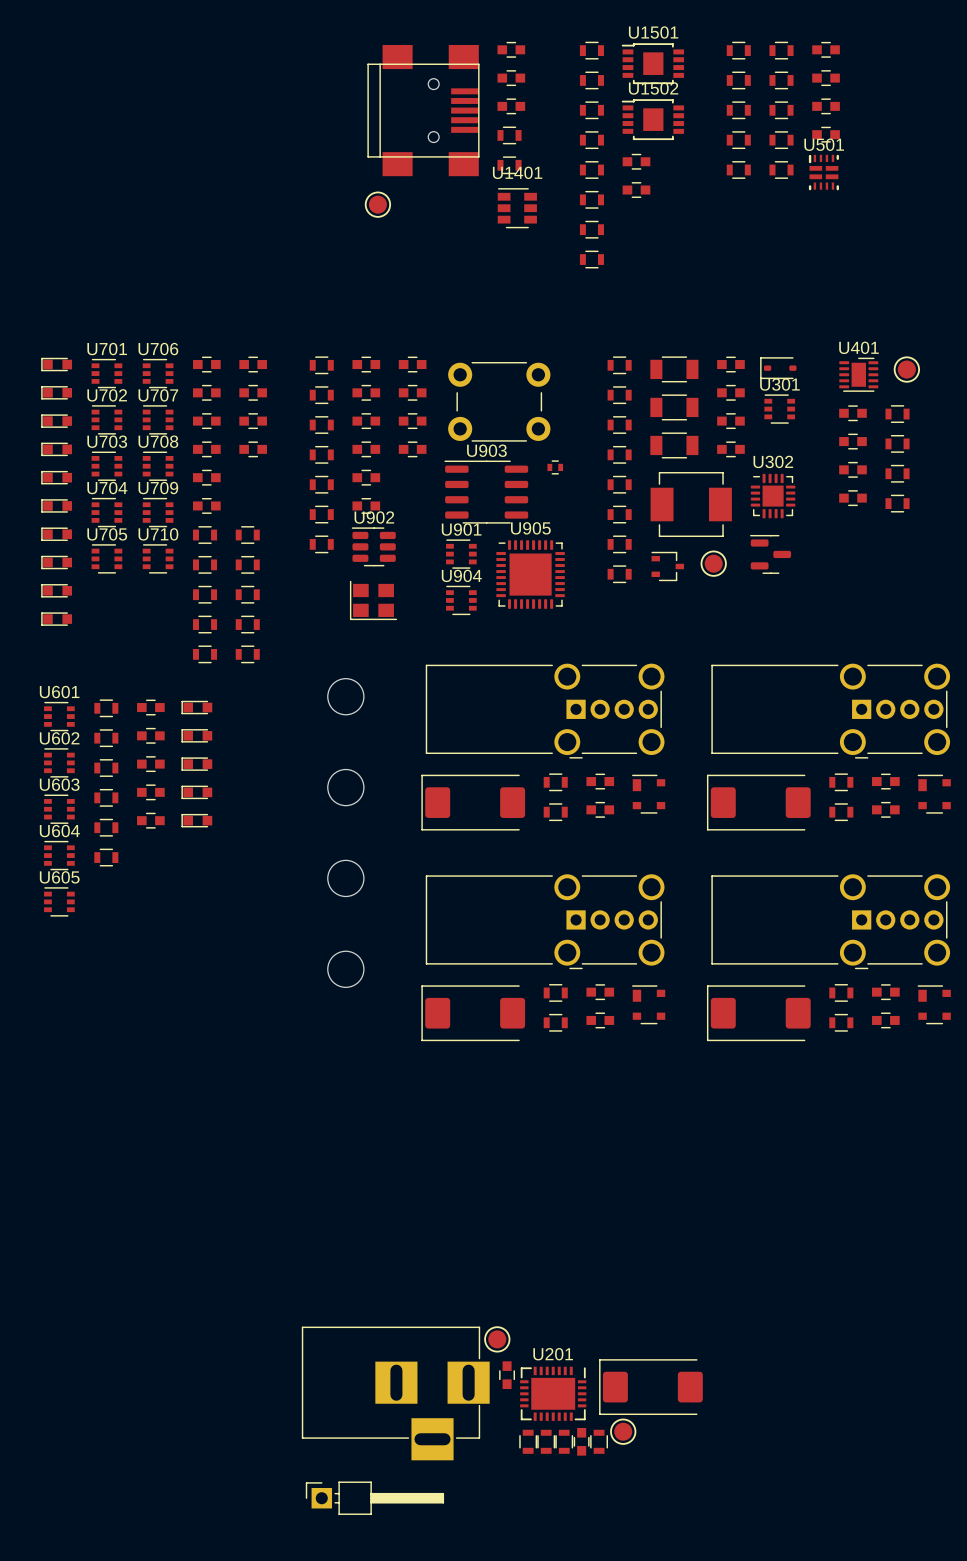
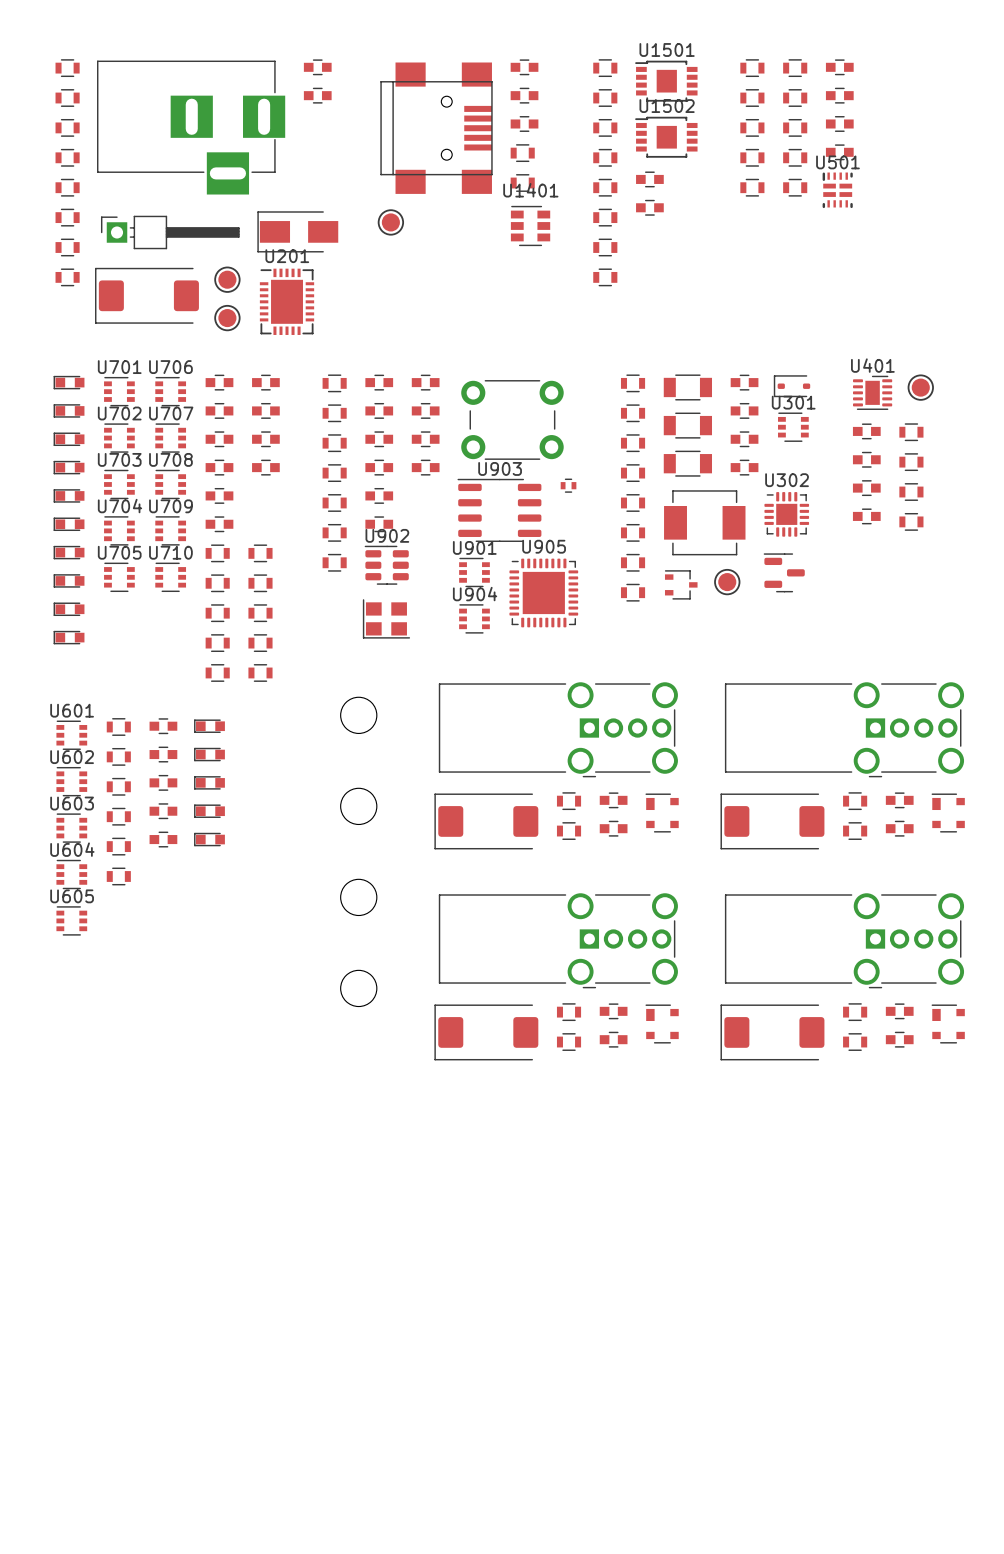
part: none -> (317, 67)
part: none -> (67, 68)
part: none -> (317, 95)
part: none -> (67, 98)
part: none -> (191, 127)
part: none -> (67, 127)
part: none -> (67, 157)
part: none -> (67, 187)
part: none -> (67, 217)
part: none -> (170, 232)
part: none -> (297, 231)
part: none -> (67, 247)
part: none -> (67, 277)
part: none -> (227, 279)
part: none -> (146, 295)
part: none -> (227, 318)
part: (497, 1339) -> none
part: (507, 1375) -> none
part: (650, 1387) -> none
part: (395, 1393) -> none
U201 rotation: 0° (553, 1393) -> 90° counterclockwise (287, 301)
U201 position: (553, 1393) -> (287, 301)
part: (623, 1431) -> none
part: (528, 1441) -> none
part: (546, 1441) -> none
part: (564, 1441) -> none
part: (581, 1441) -> none
part: (599, 1441) -> none
part: (374, 1498) -> none

